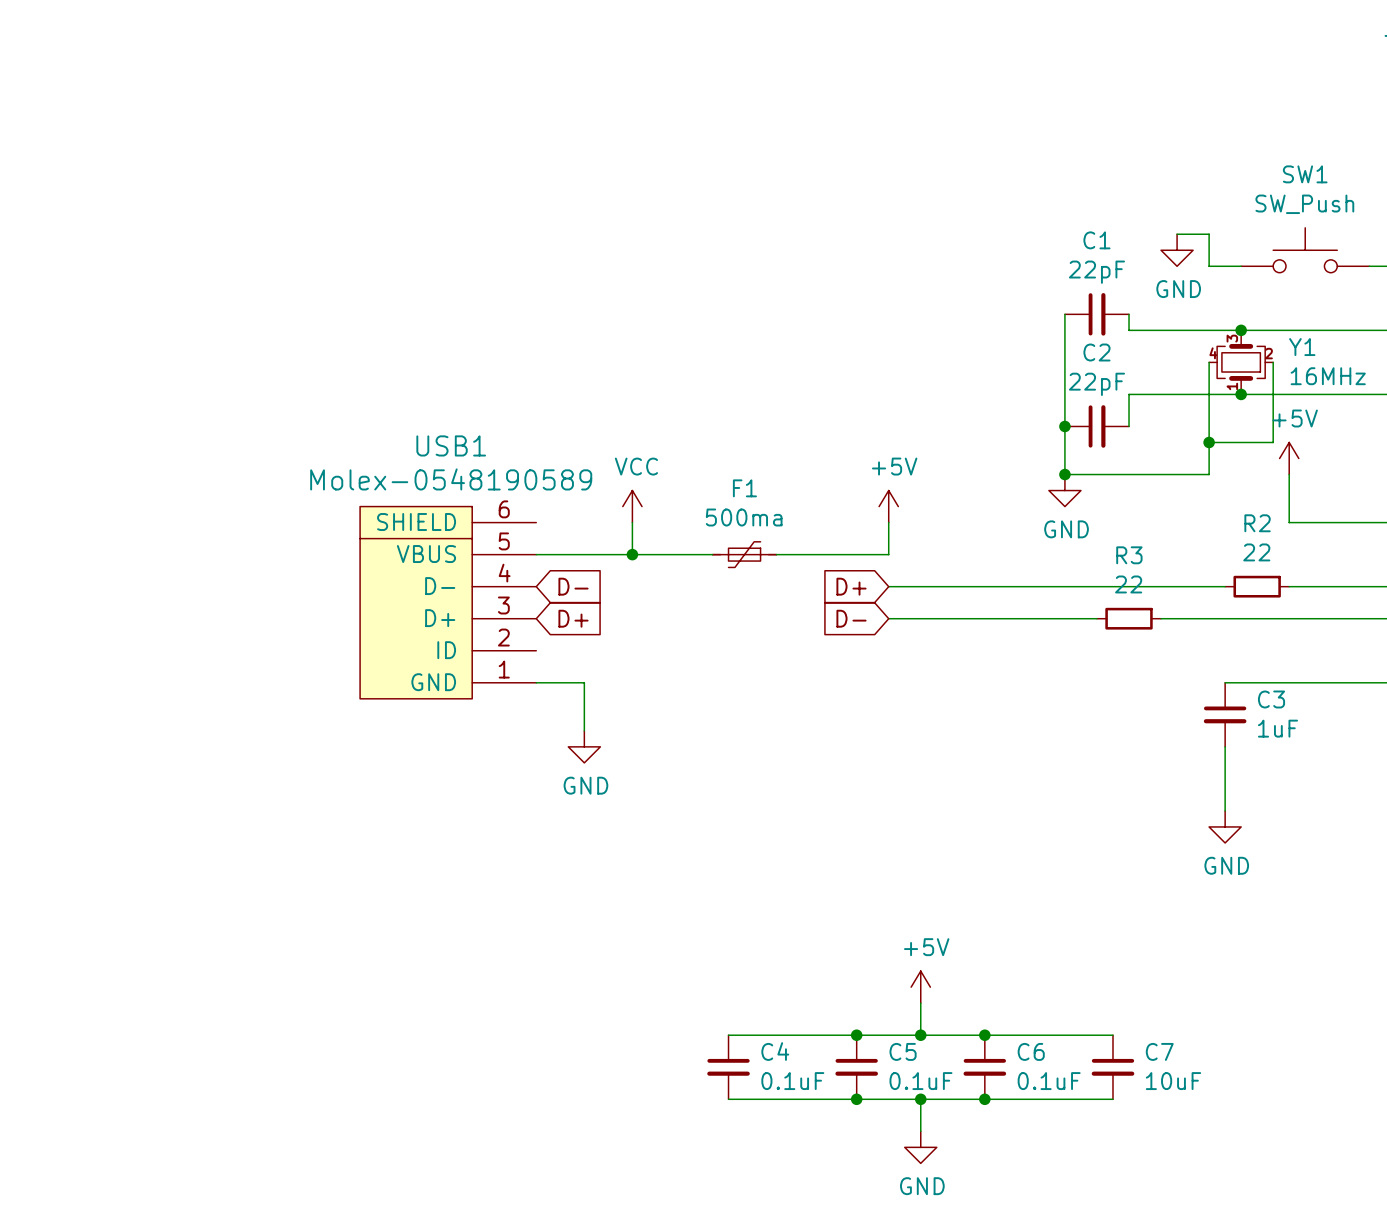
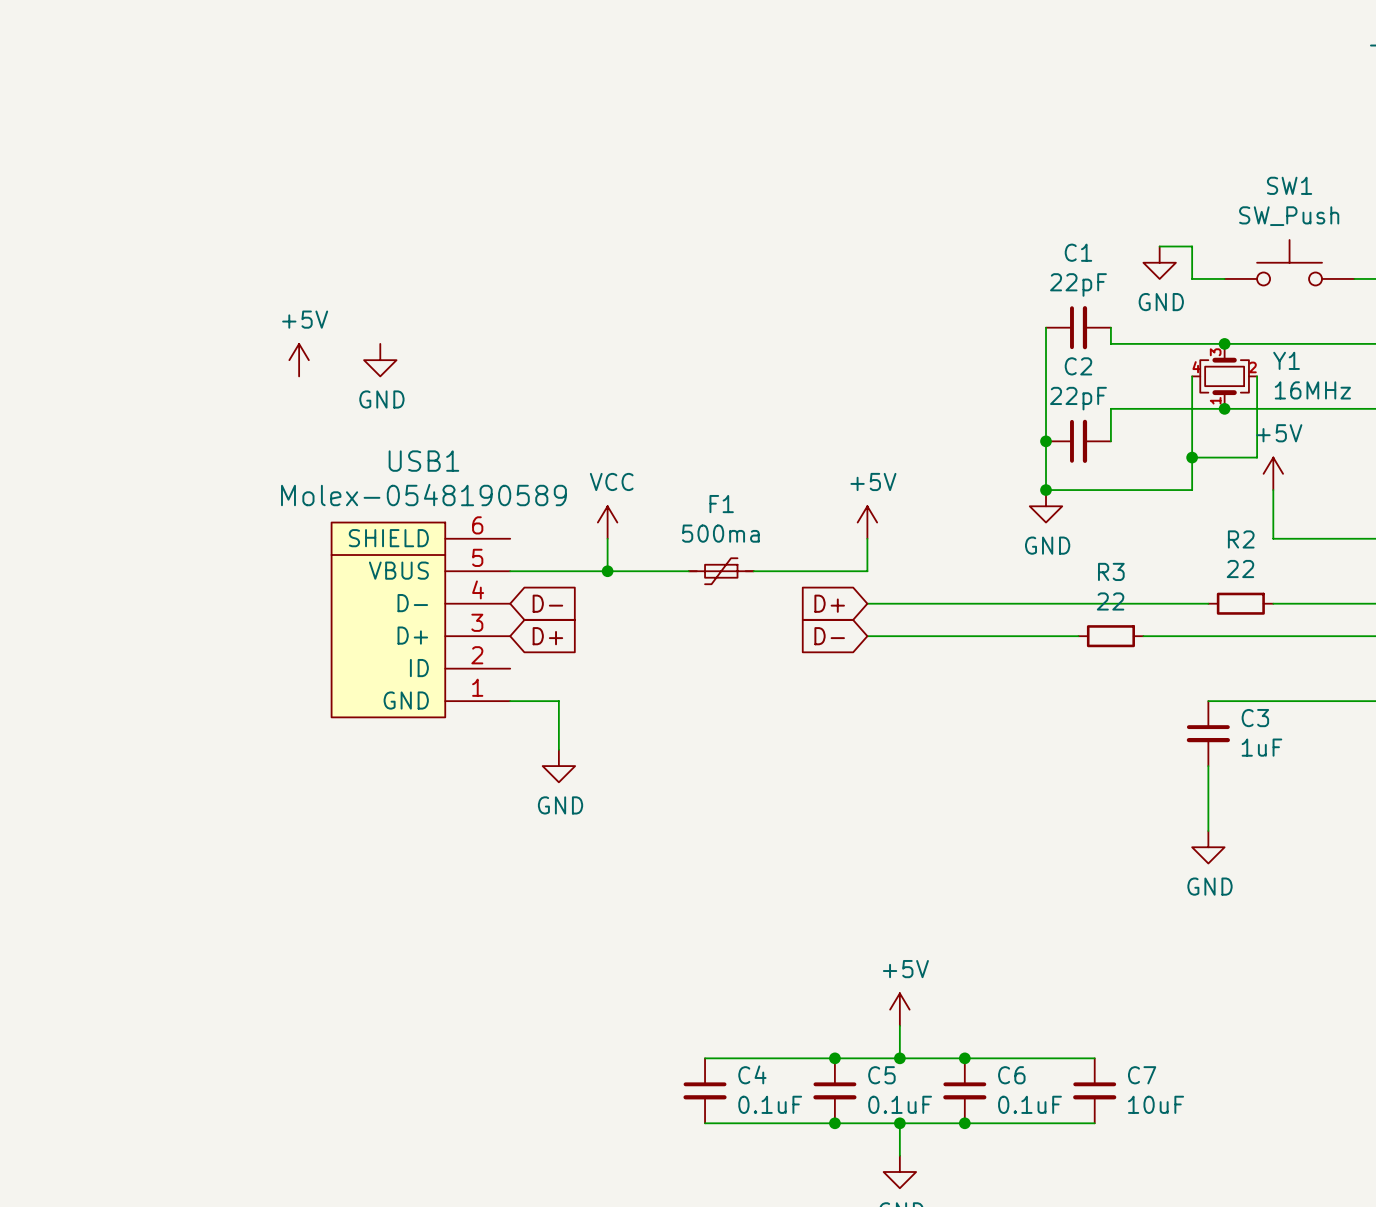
power symbol: none -> +5V (299, 360)
power symbol: none -> GND (380, 360)

